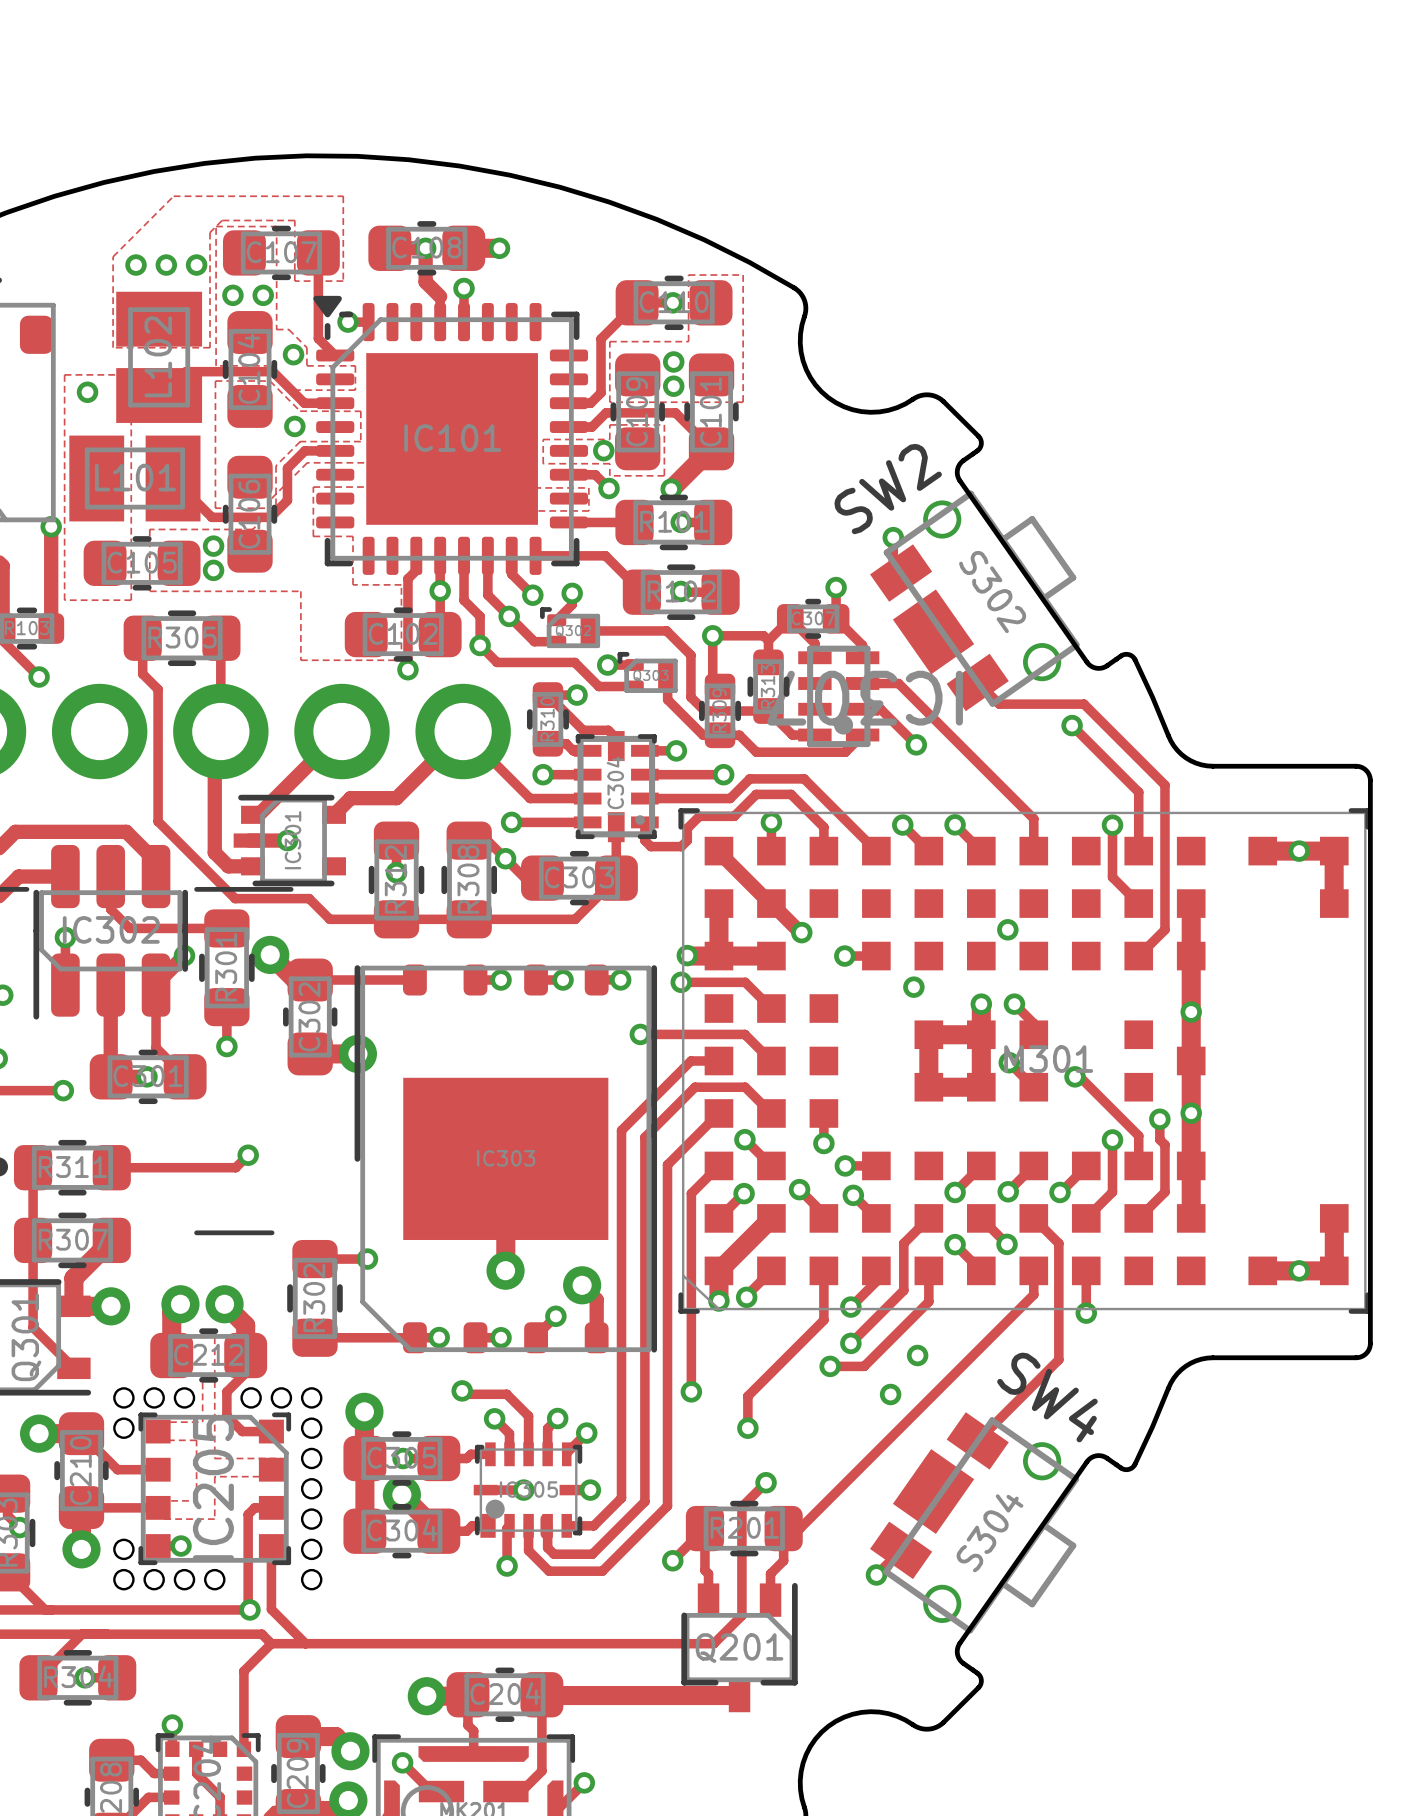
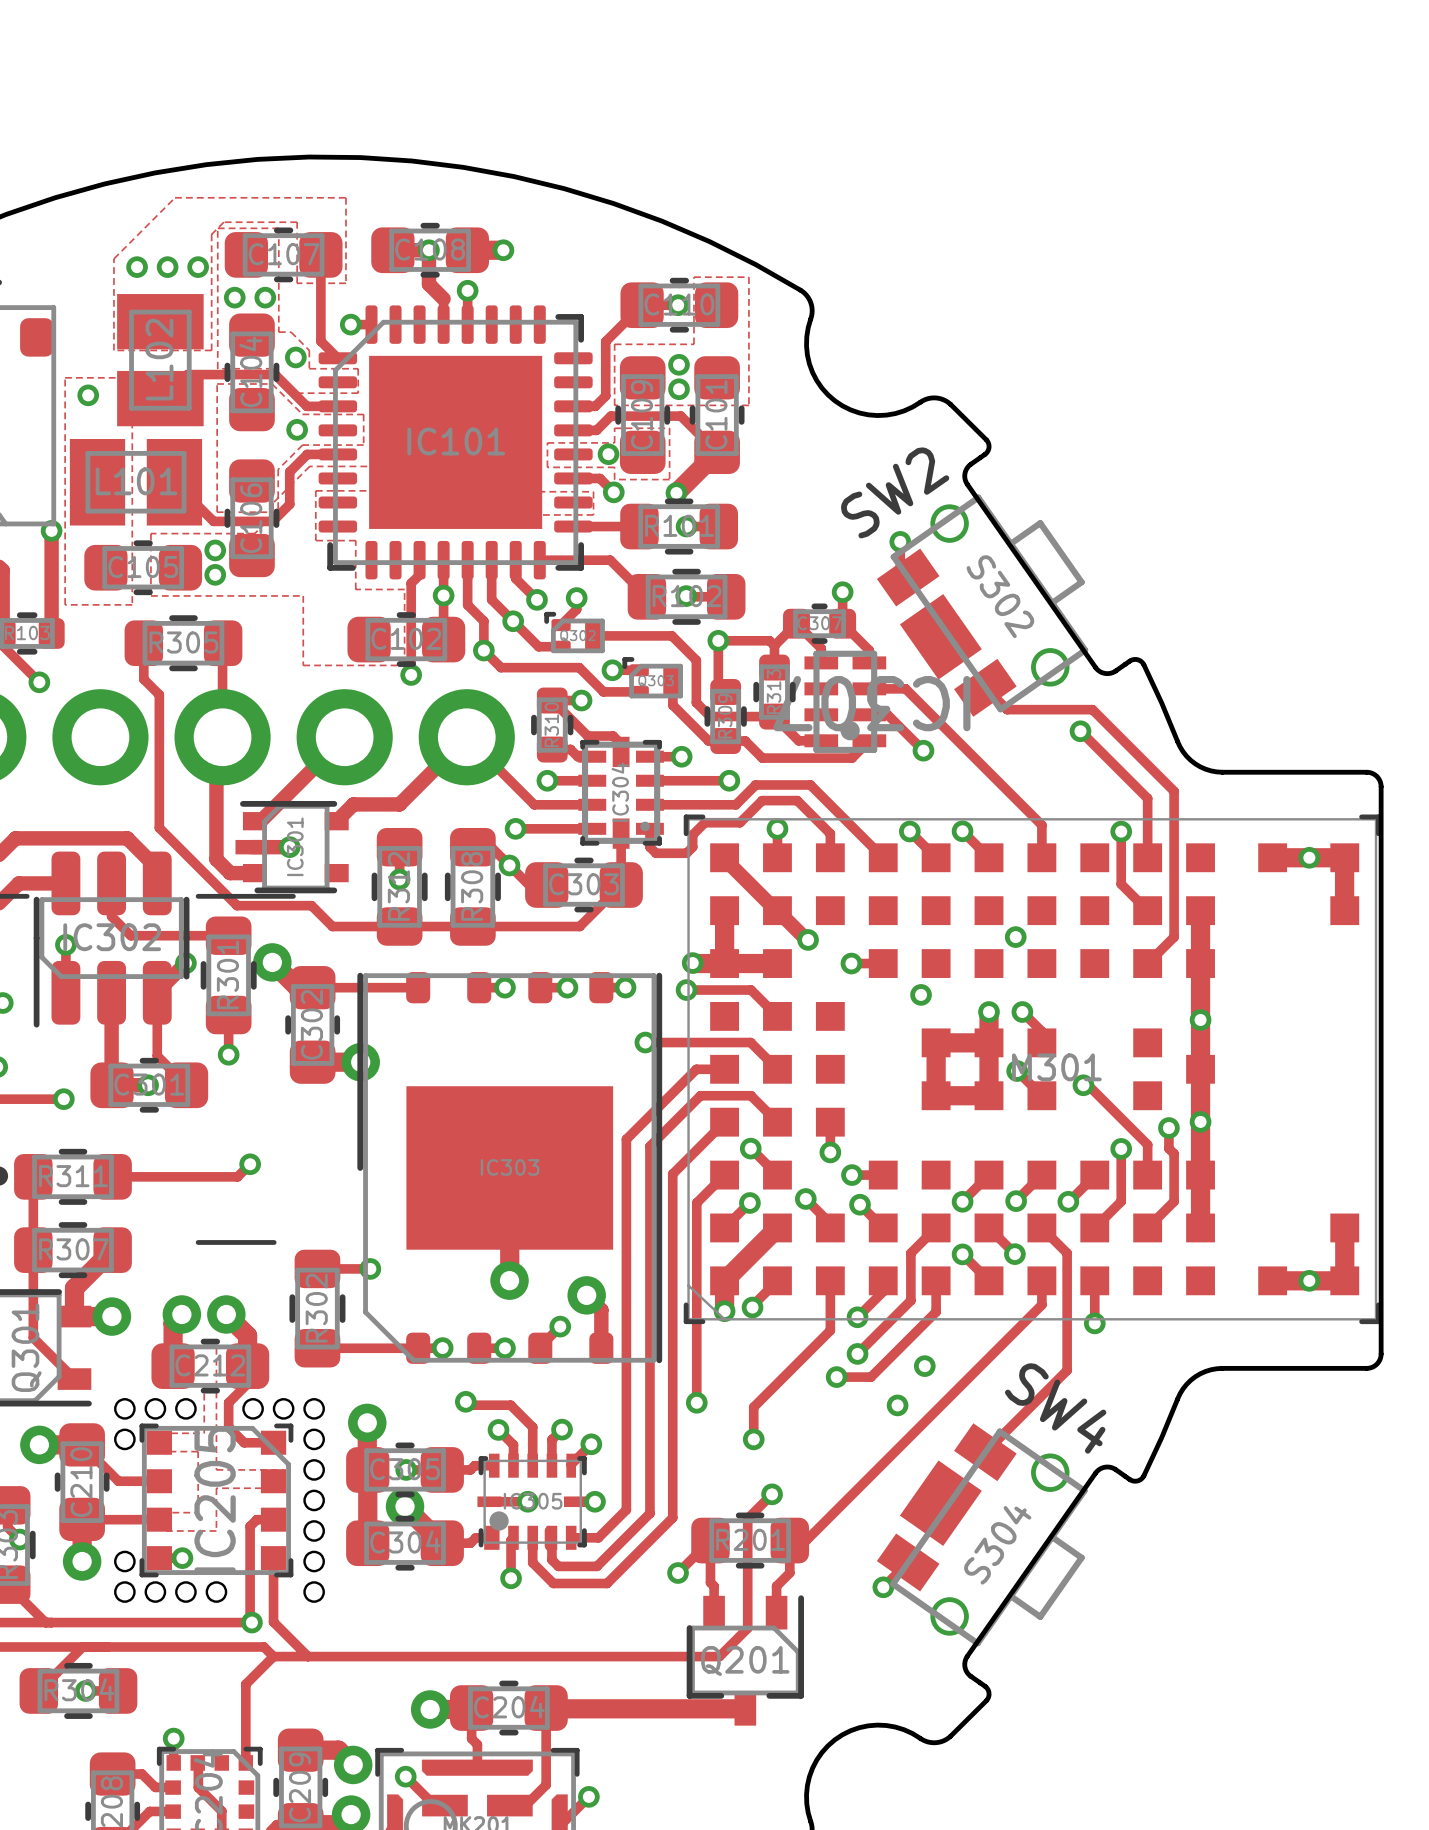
part footprint: [313, 295, 589, 575] -> [318, 305, 593, 580]

